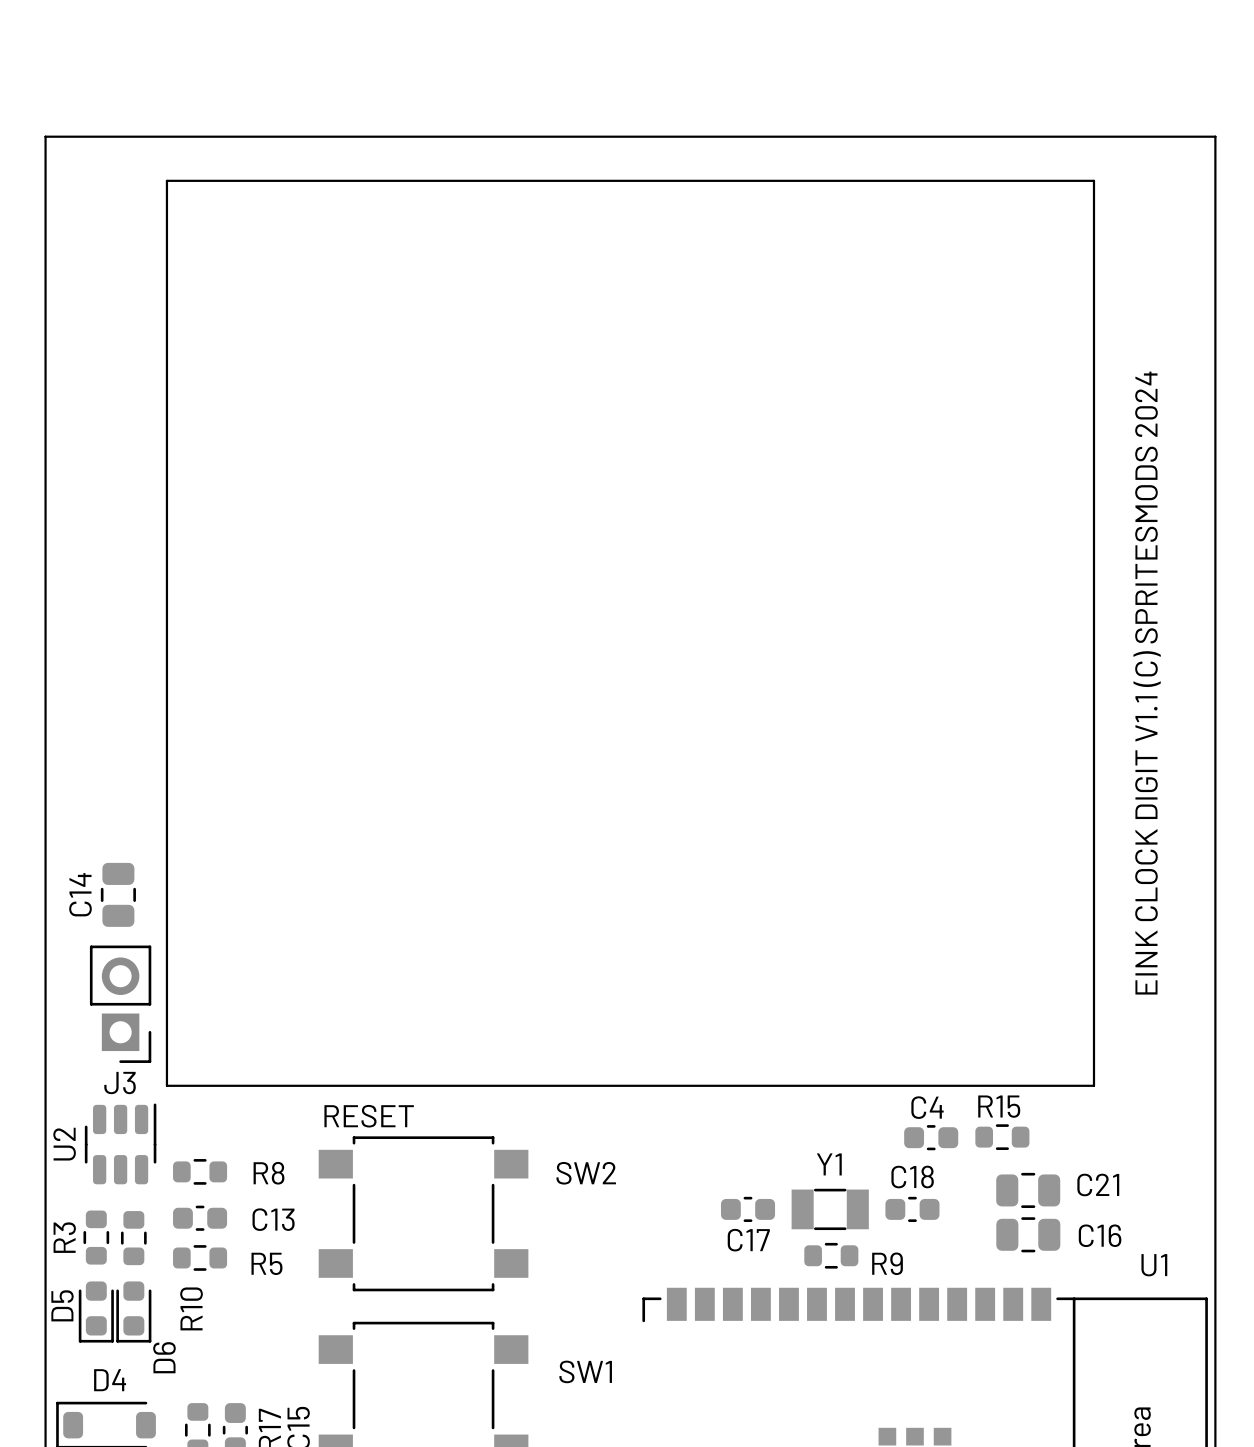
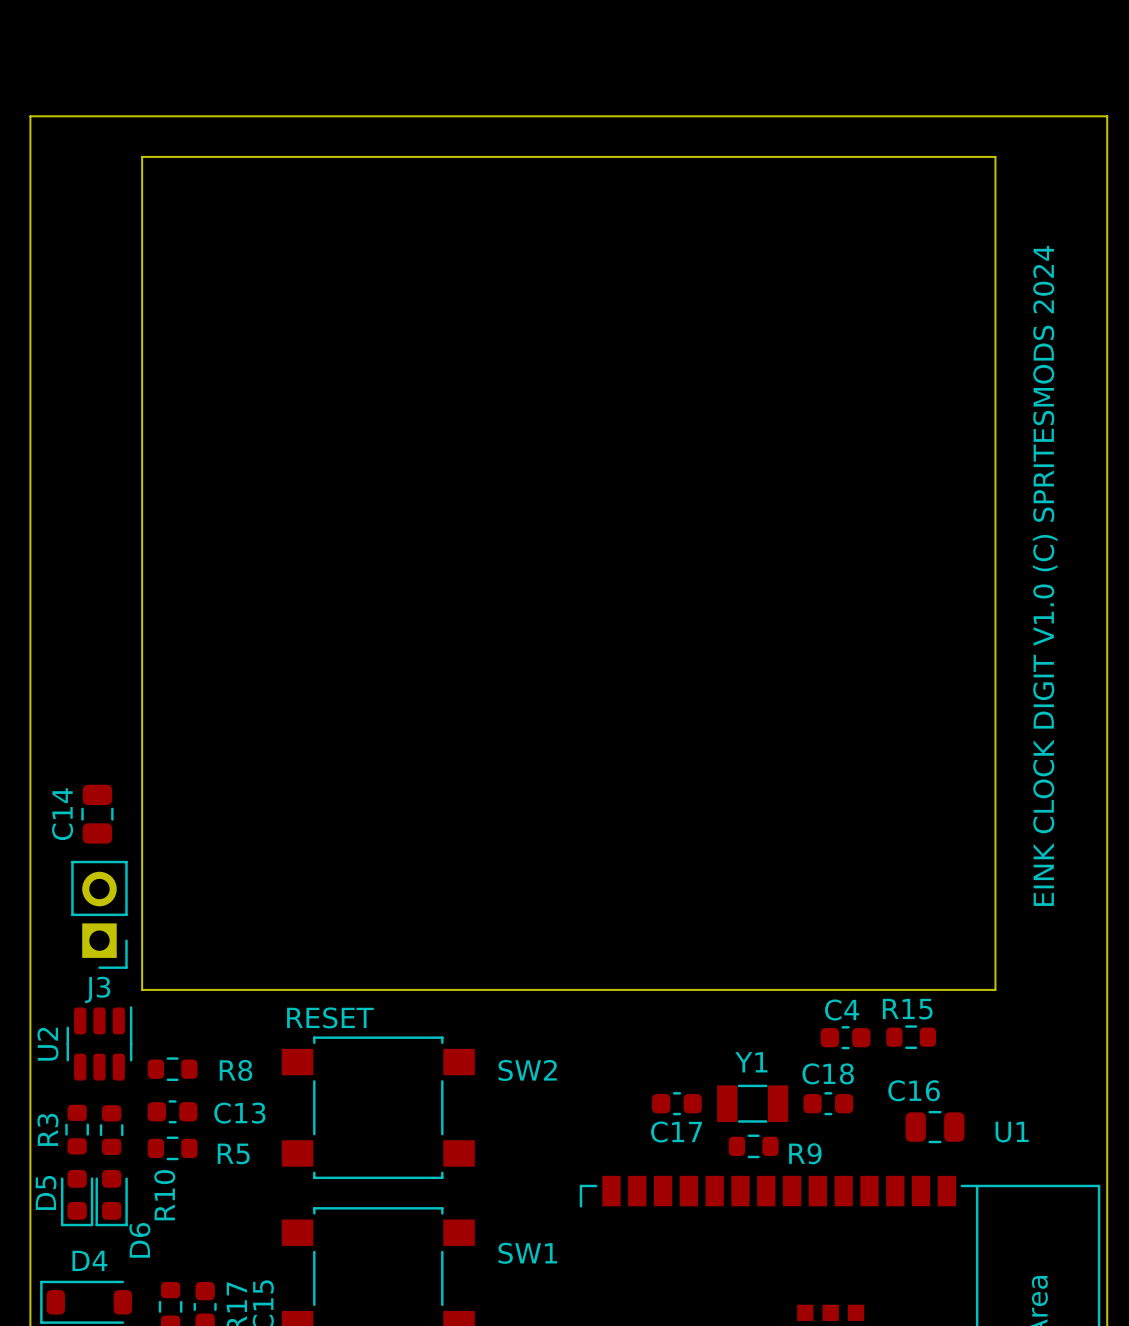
text: EINK CLOCK DIGIT V1.1 (C) SPRITESMODS 2024 (1147, 683) -> EINK CLOCK DIGIT V1.0 (C) SPRITESMODS 2024 (1045, 575)
C21: (1028, 1190) -> none
C16 name position: C16 (1100, 1235) -> C16 (914, 1090)
U1 name position: U1 (1154, 1265) -> U1 (1012, 1132)

